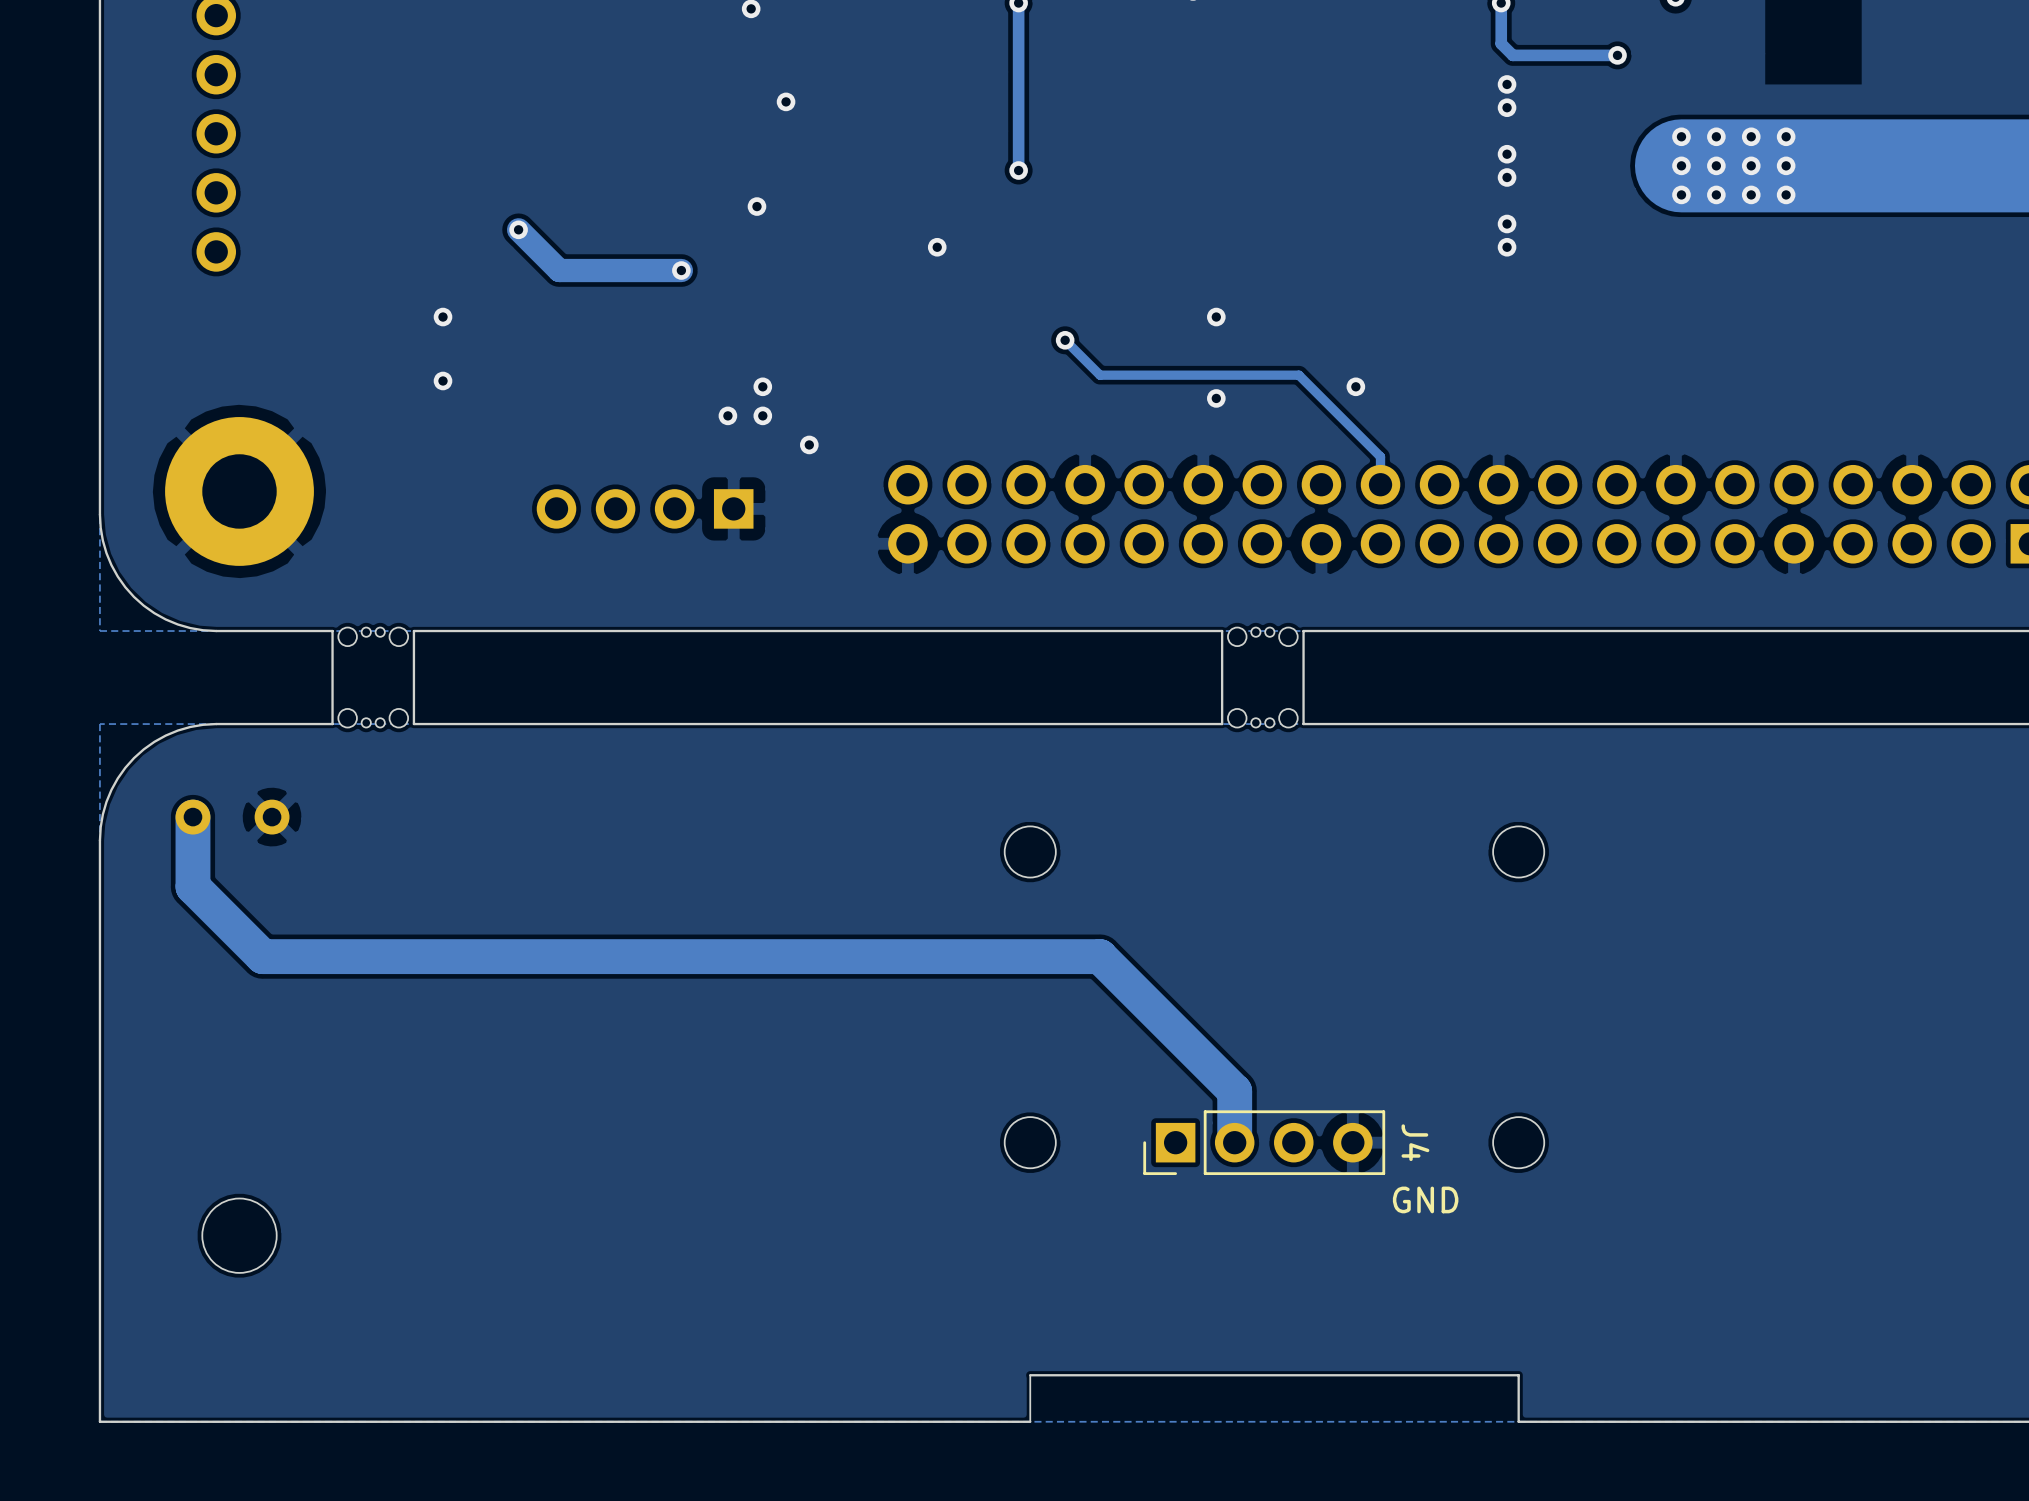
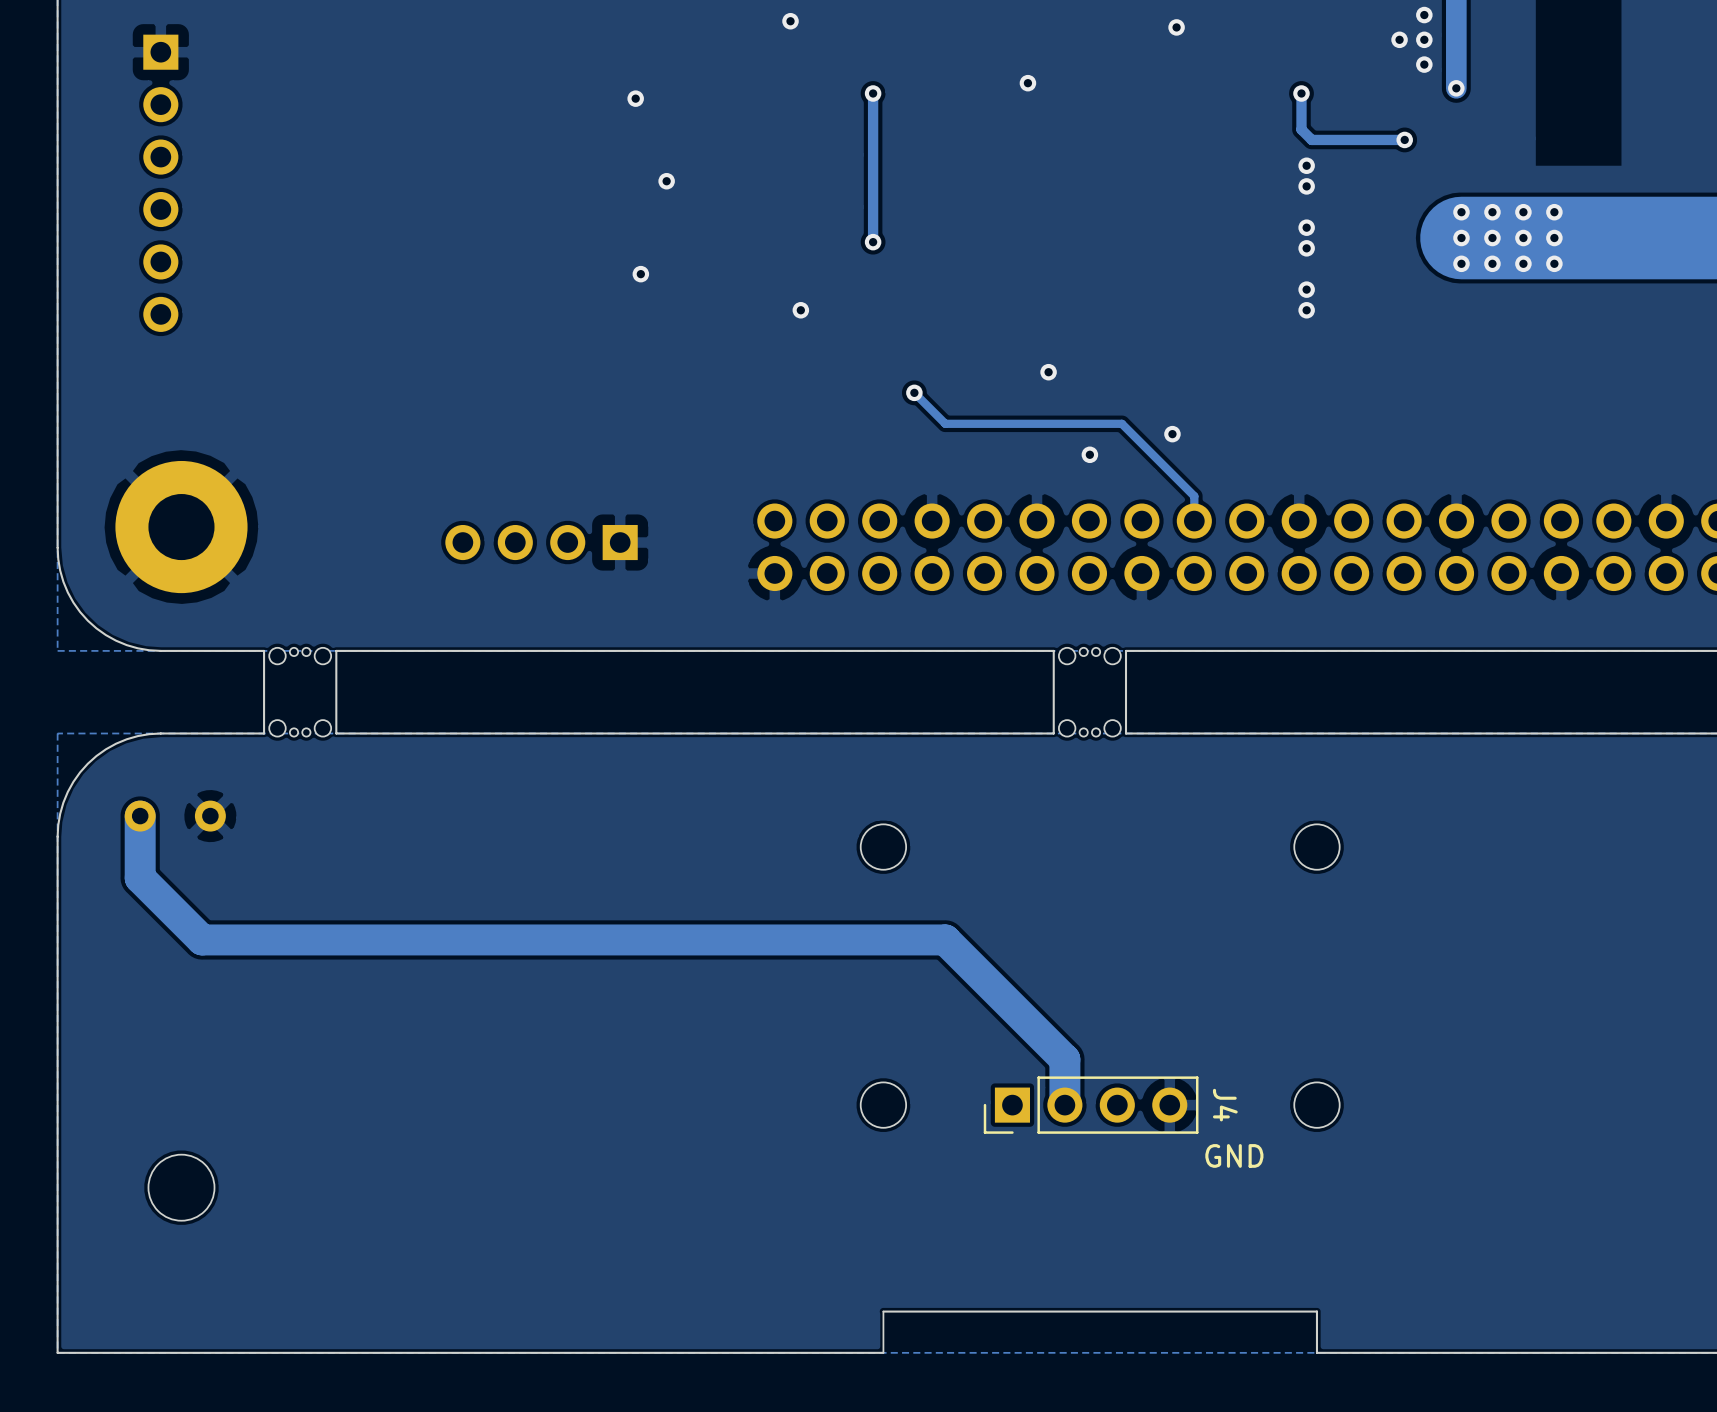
track: (518, 229) (559, 270) (681, 270) -> none
via: (518, 229) -> none
via: (681, 270) -> none
via: (443, 317) -> none
via: (443, 380) -> none
via: (762, 386) -> none
via position: (1216, 398) -> (1089, 454)
via: (727, 415) -> none
via: (762, 415) -> none
via: (809, 444) -> none

